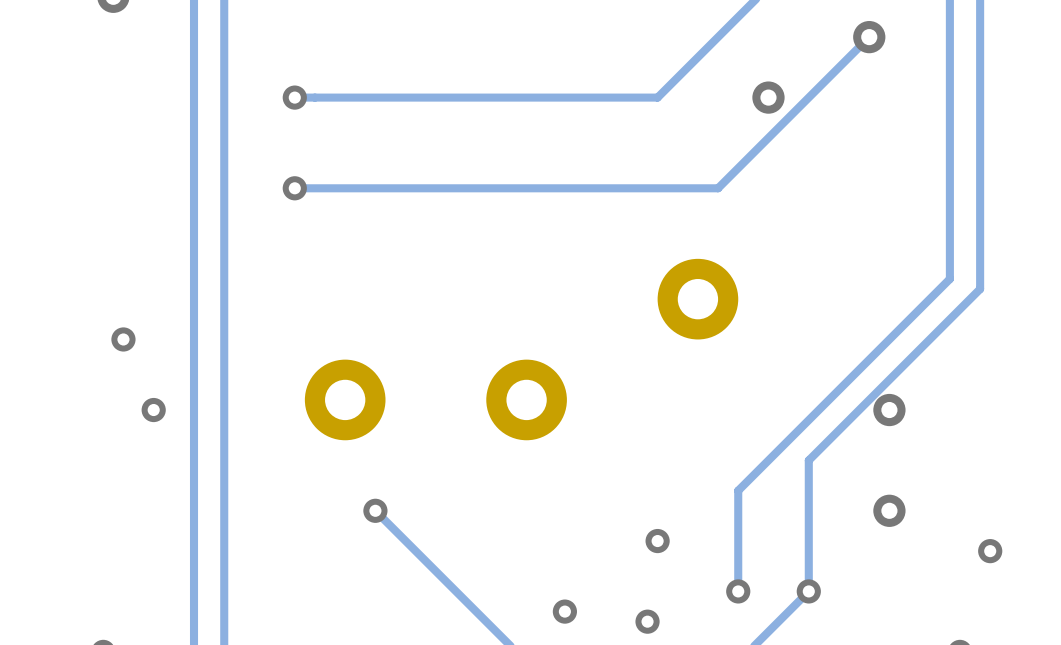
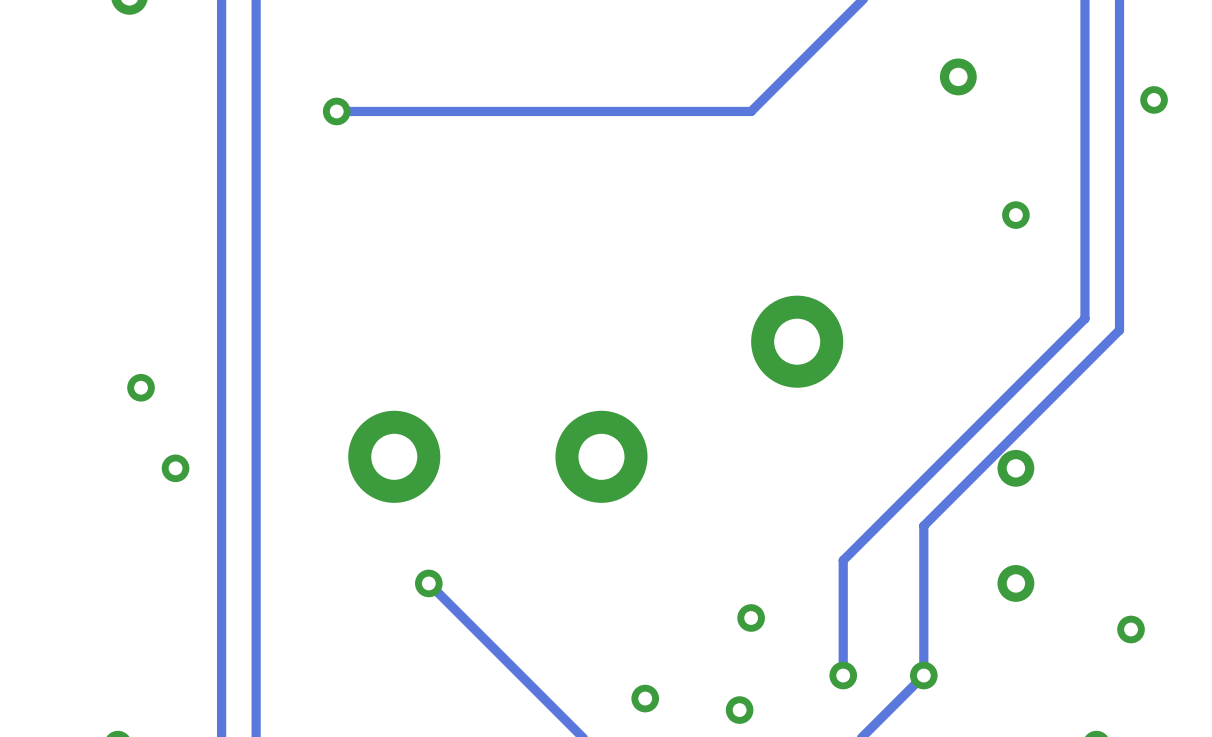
track: (869, 37) (718, 188) (294, 188) -> none
via: (869, 37) -> none
via: none -> (958, 76)
via: none -> (1154, 99)
via: (768, 97) -> none
via: (294, 188) -> none
via: none -> (1015, 215)

